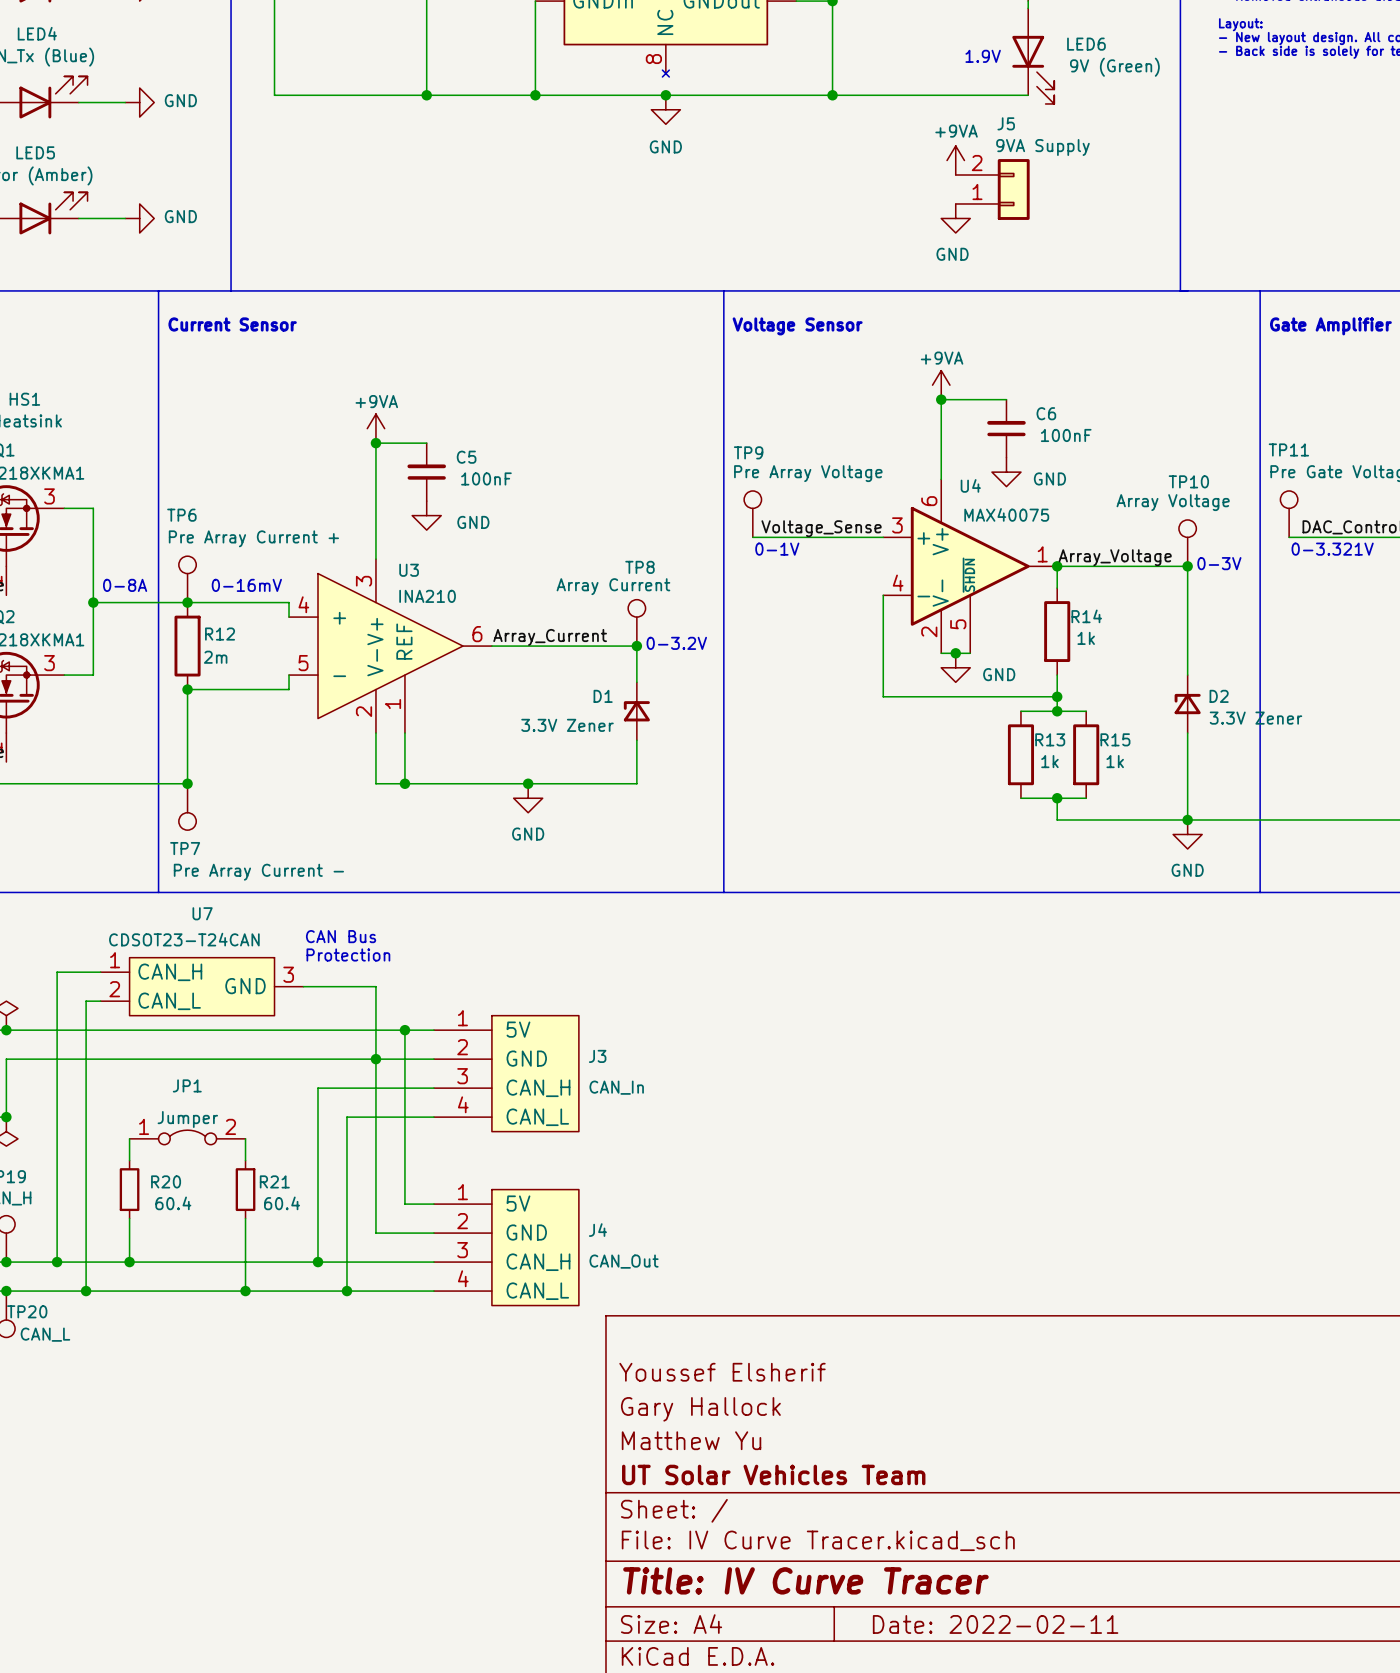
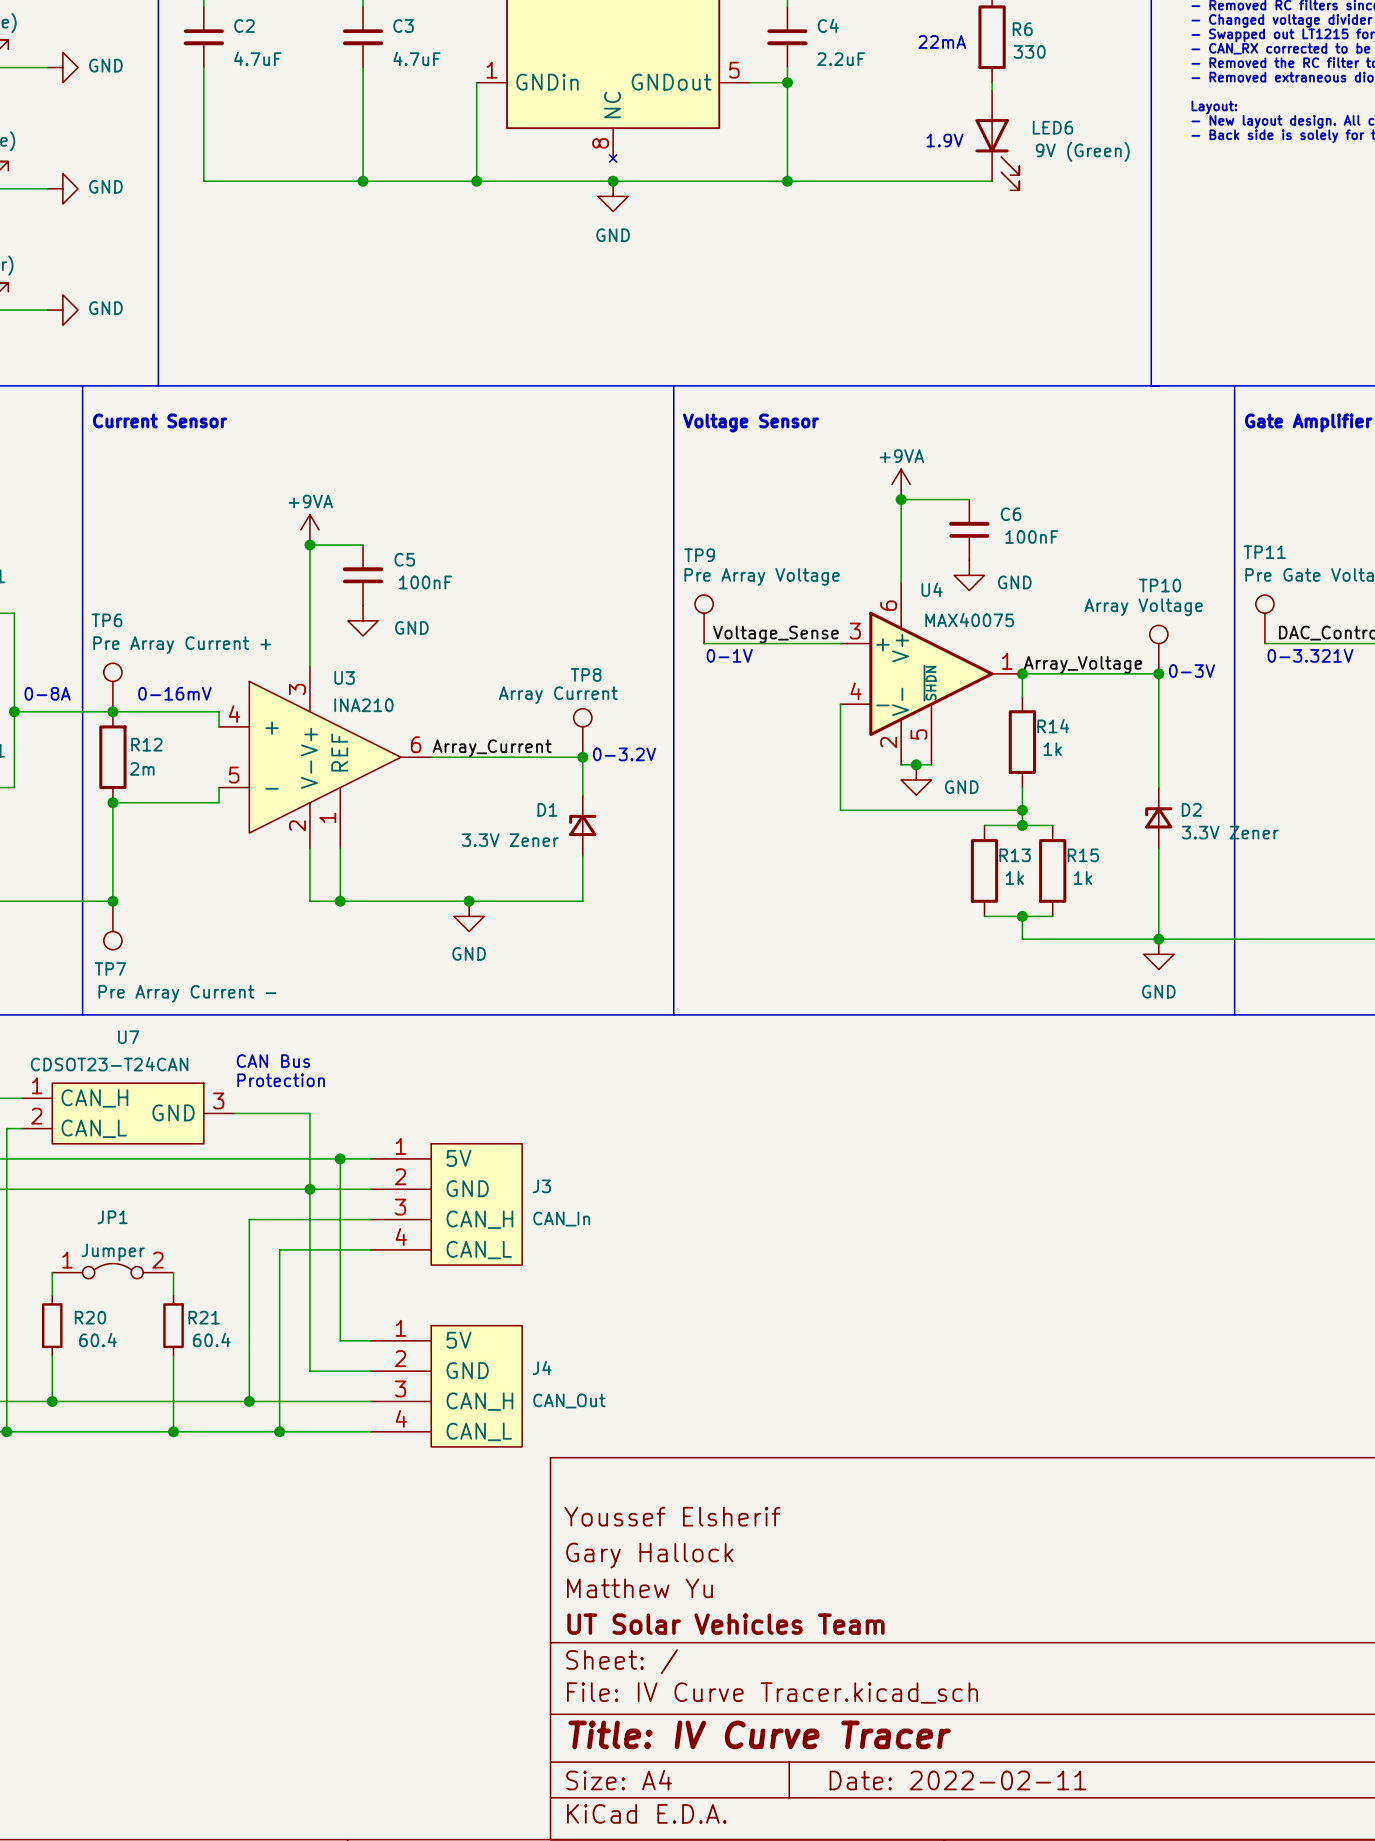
power symbol: +9VA (955, 160) -> none
J5: 9VA Supply (992, 189) -> none
power symbol: GND (955, 218) -> none

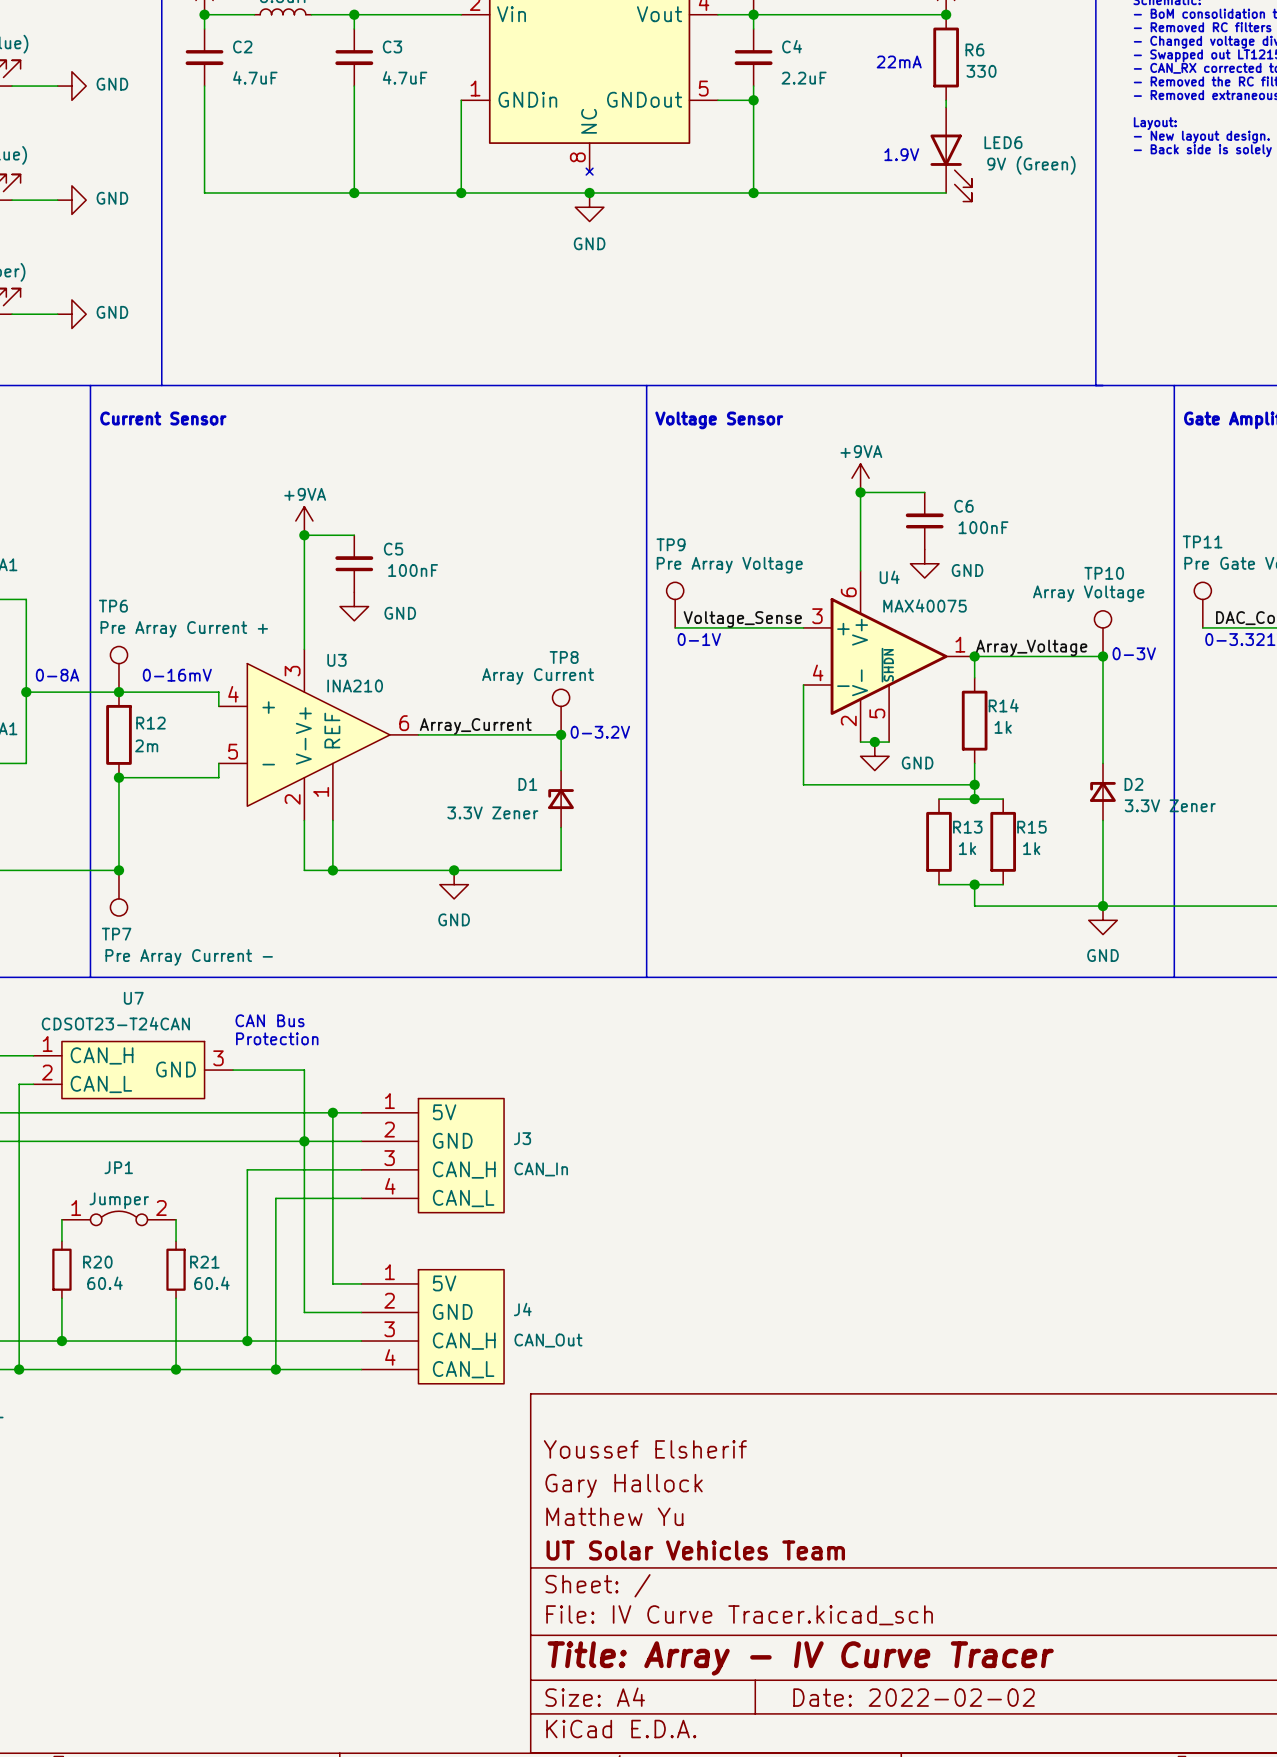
title block: Title: IV Curve Tracer (759, 1734) -> Title: Array - IV Curve Tracer (800, 1658)
title block: Date: 2022-02-11 (957, 1780) -> Date: 2022-02-02 (914, 1697)

